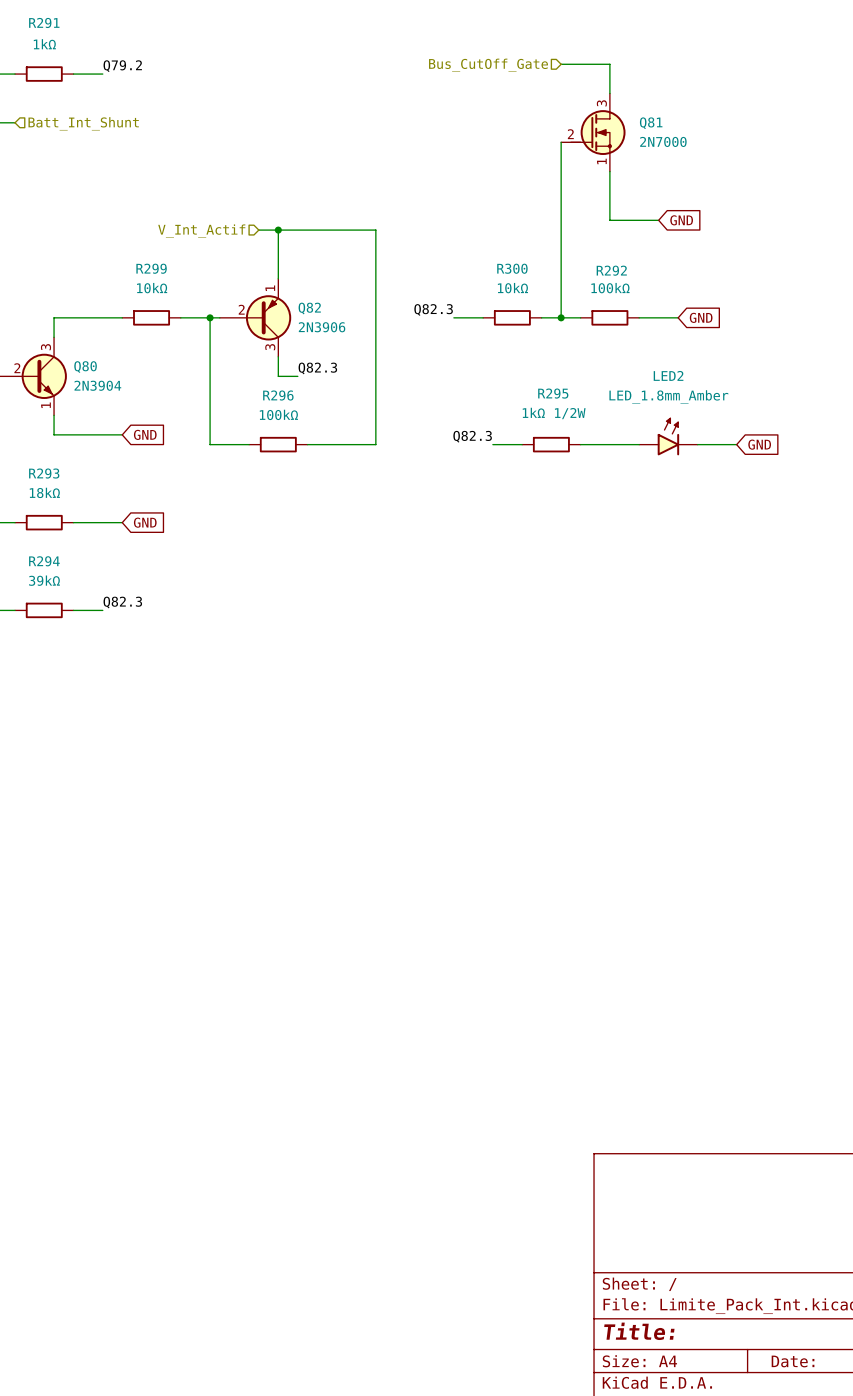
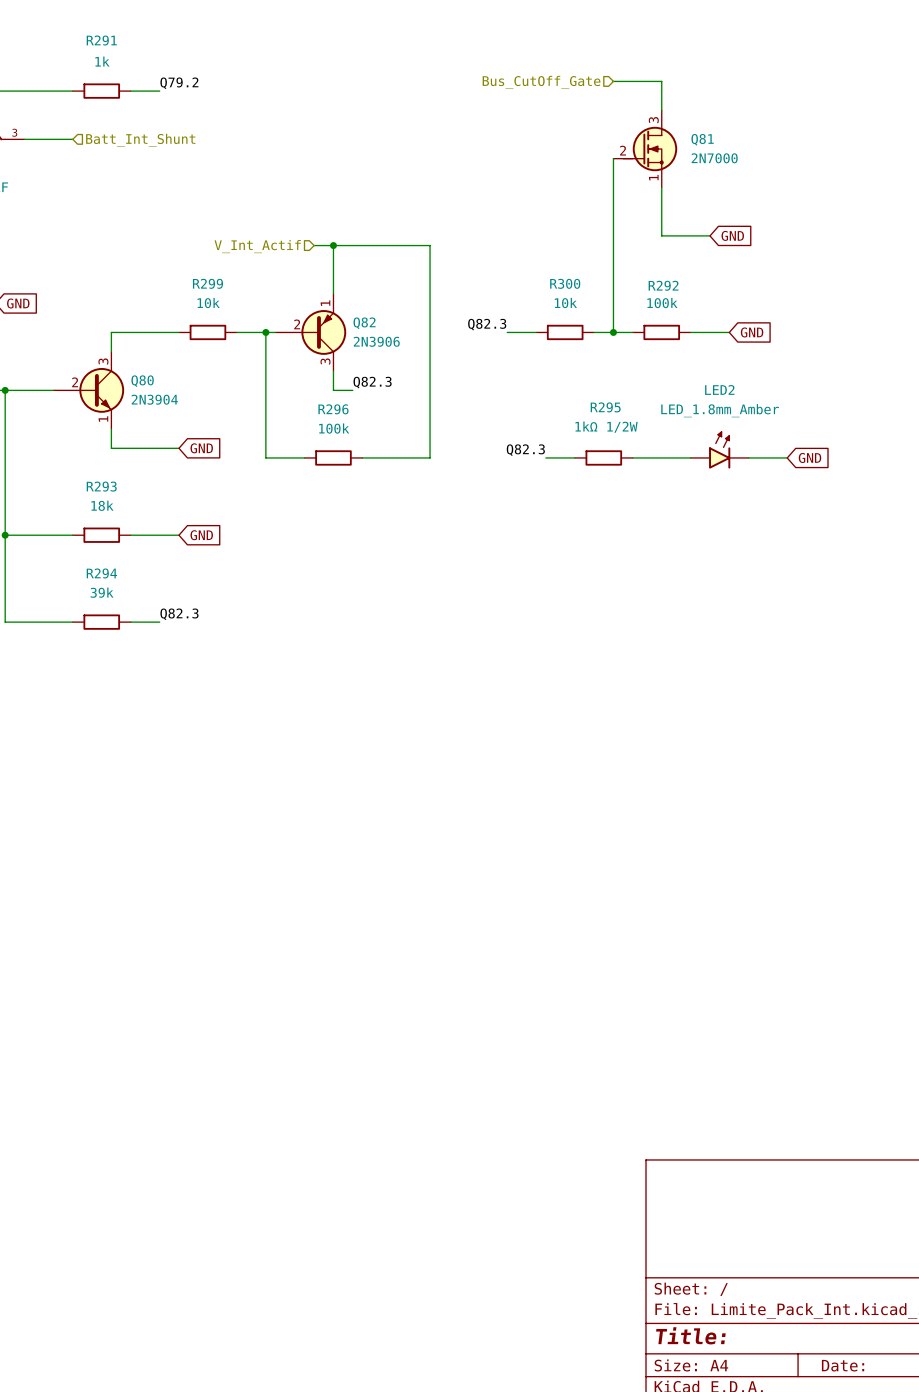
R291 value: 1kΩ (44, 44) -> 1k (102, 61)
R299 value: 10kΩ (152, 288) -> 10k (208, 303)
R300 value: 10kΩ (512, 288) -> 10k (565, 303)
R292 value: 100kΩ (610, 288) -> 100k (662, 303)
R296 value: 100kΩ (278, 414) -> 100k (334, 428)
R293 value: 18kΩ (44, 492) -> 18k (102, 505)
R294 value: 39kΩ (44, 580) -> 39k (102, 592)

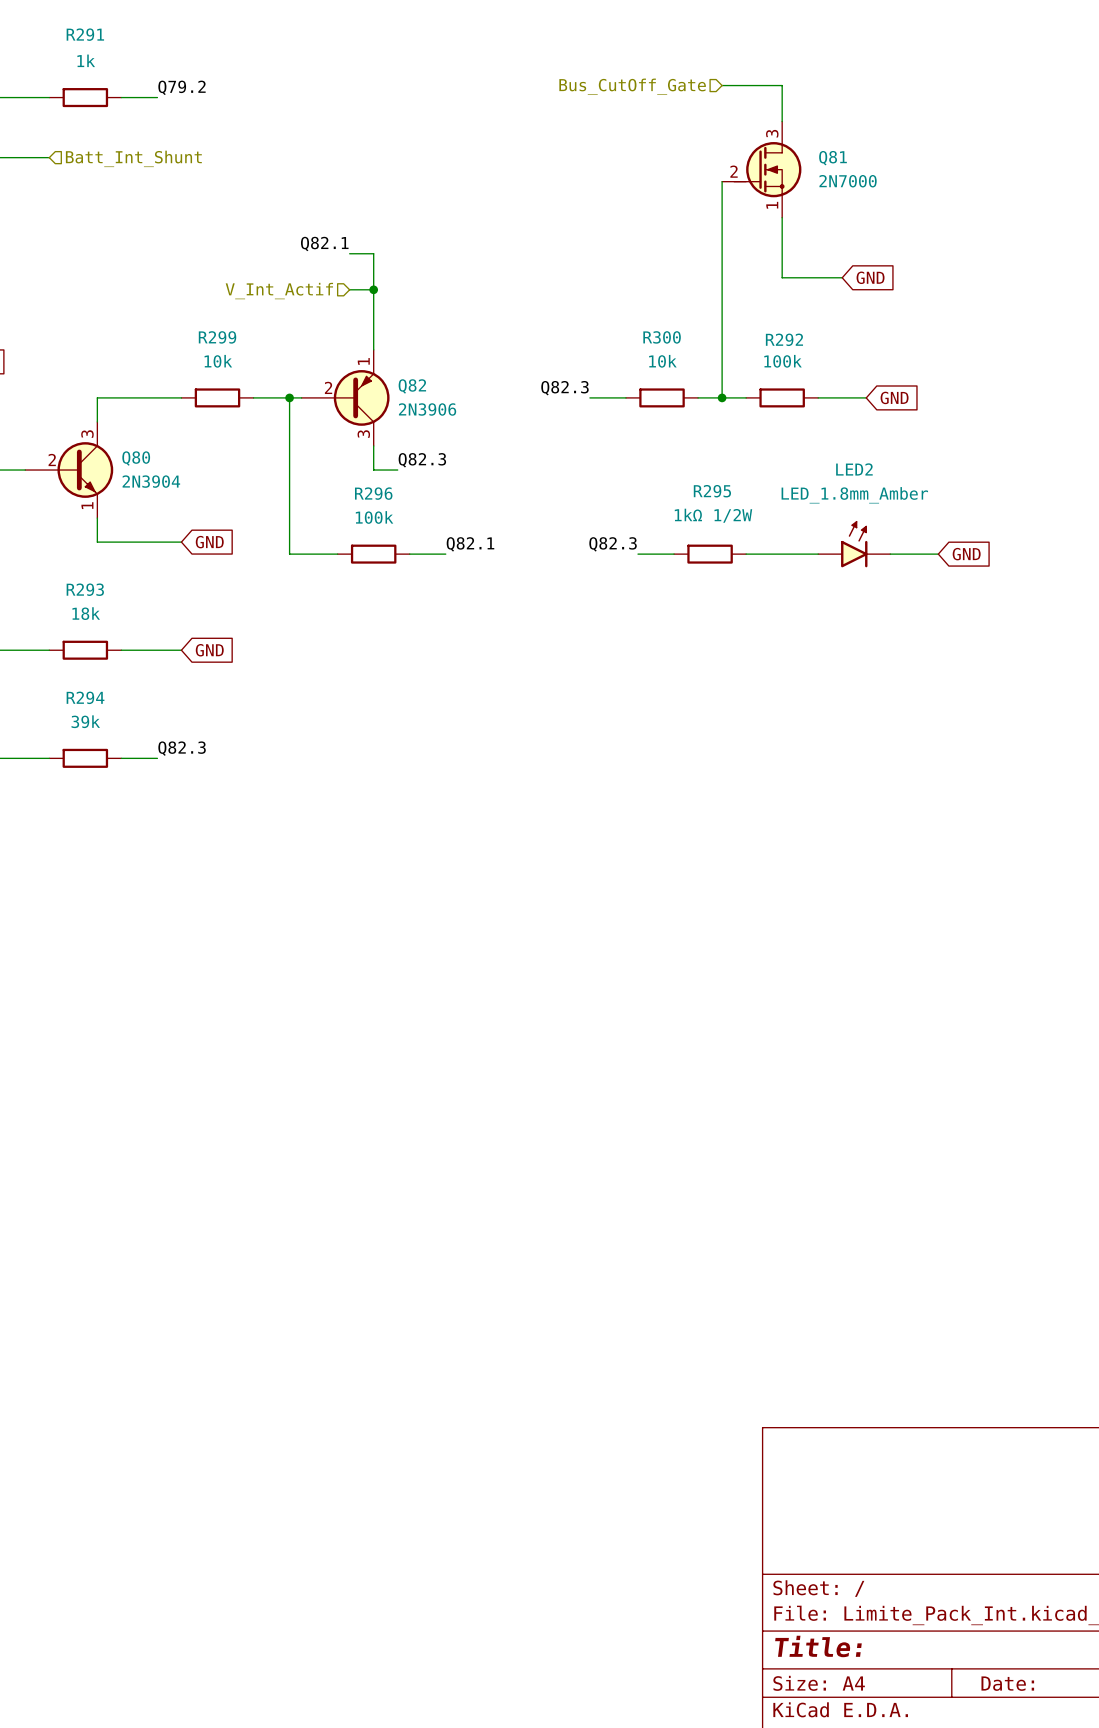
label: none -> Q82.1 (324, 244)
wire: (333, 245) (430, 245) (430, 457) (391, 457) -> (373, 289) (373, 253) (349, 253)
label: none -> Q82.1 (470, 544)

